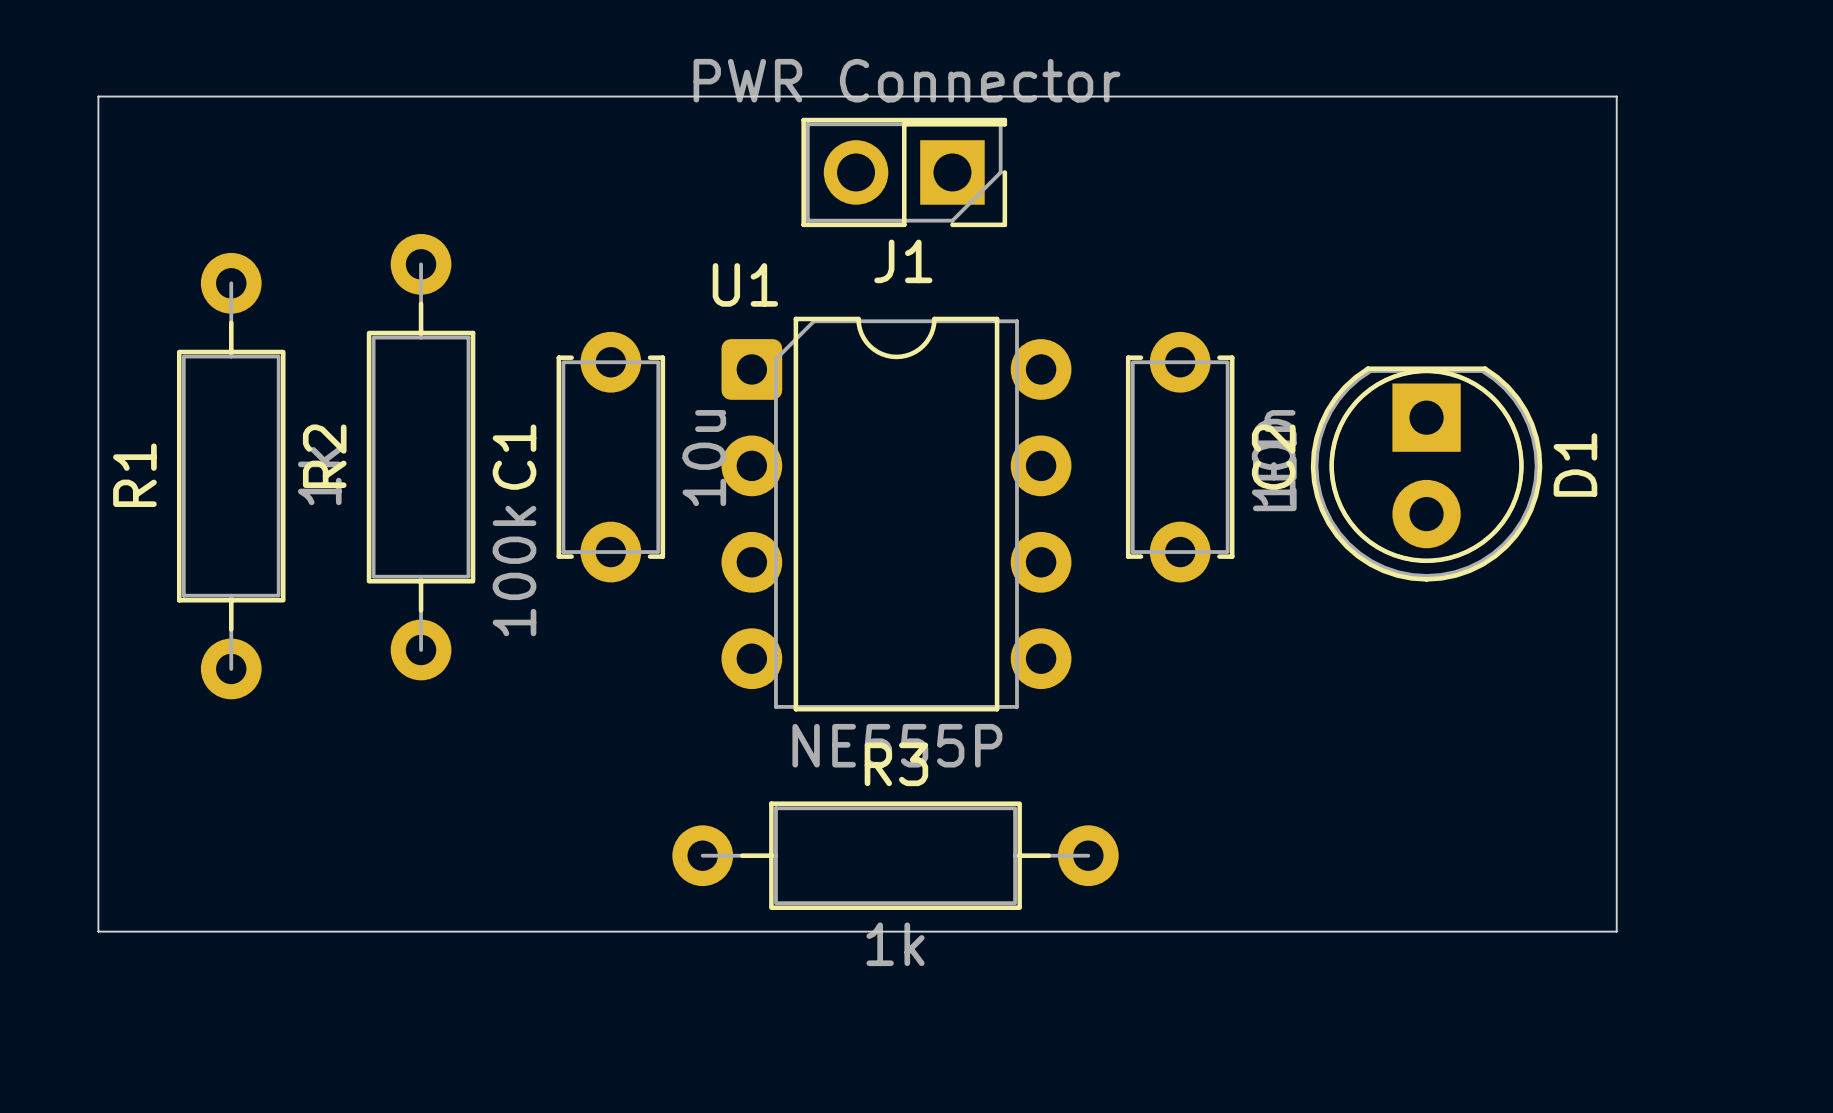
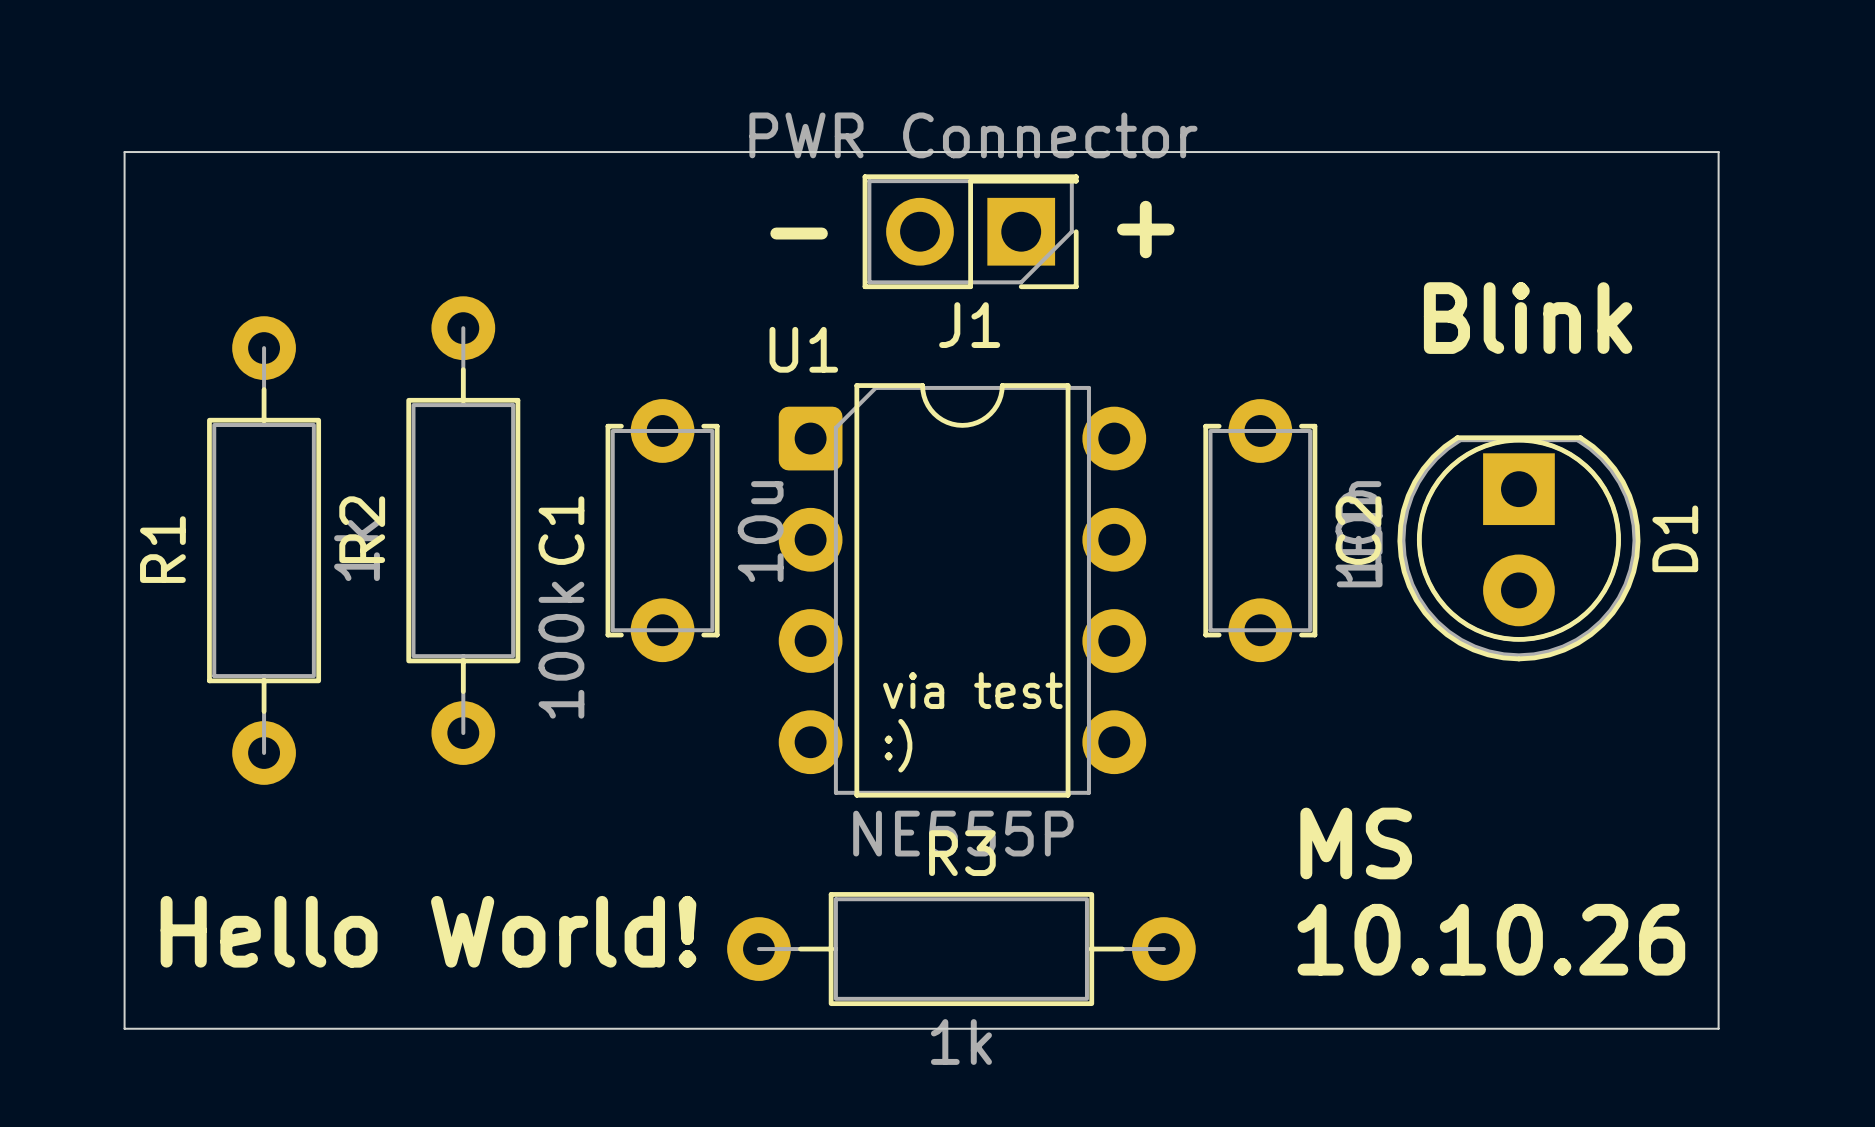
text: none -> + (1145, 229)
text: none -> - (799, 233)
text: none -> Blink (1528, 318)
text: none -> via test (972, 690)
text: none -> :) (898, 745)
text: none -> MS (1356, 843)
text: none -> Hello World! (428, 931)
text: none -> 10.10.26 (1491, 939)

